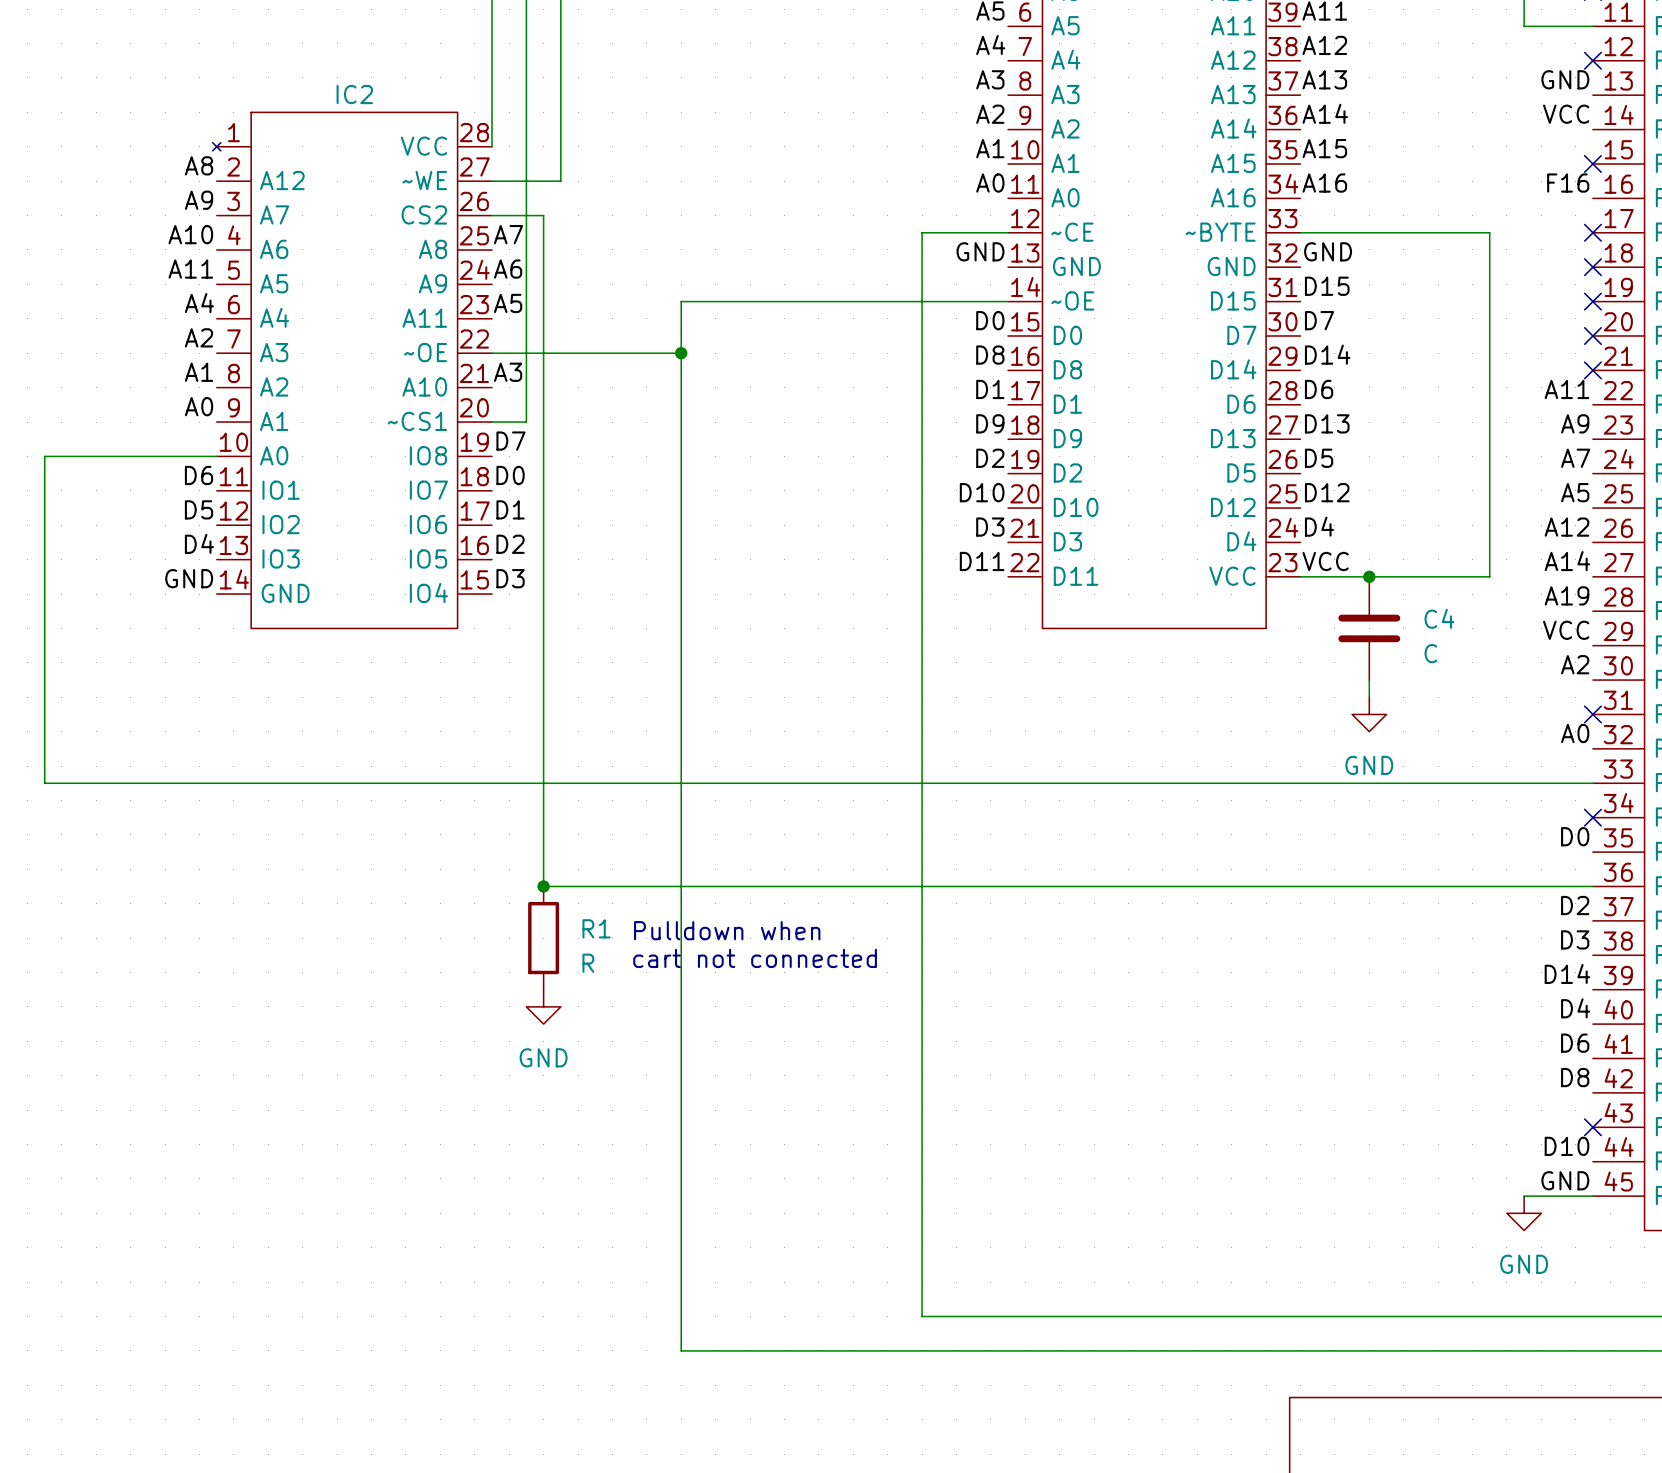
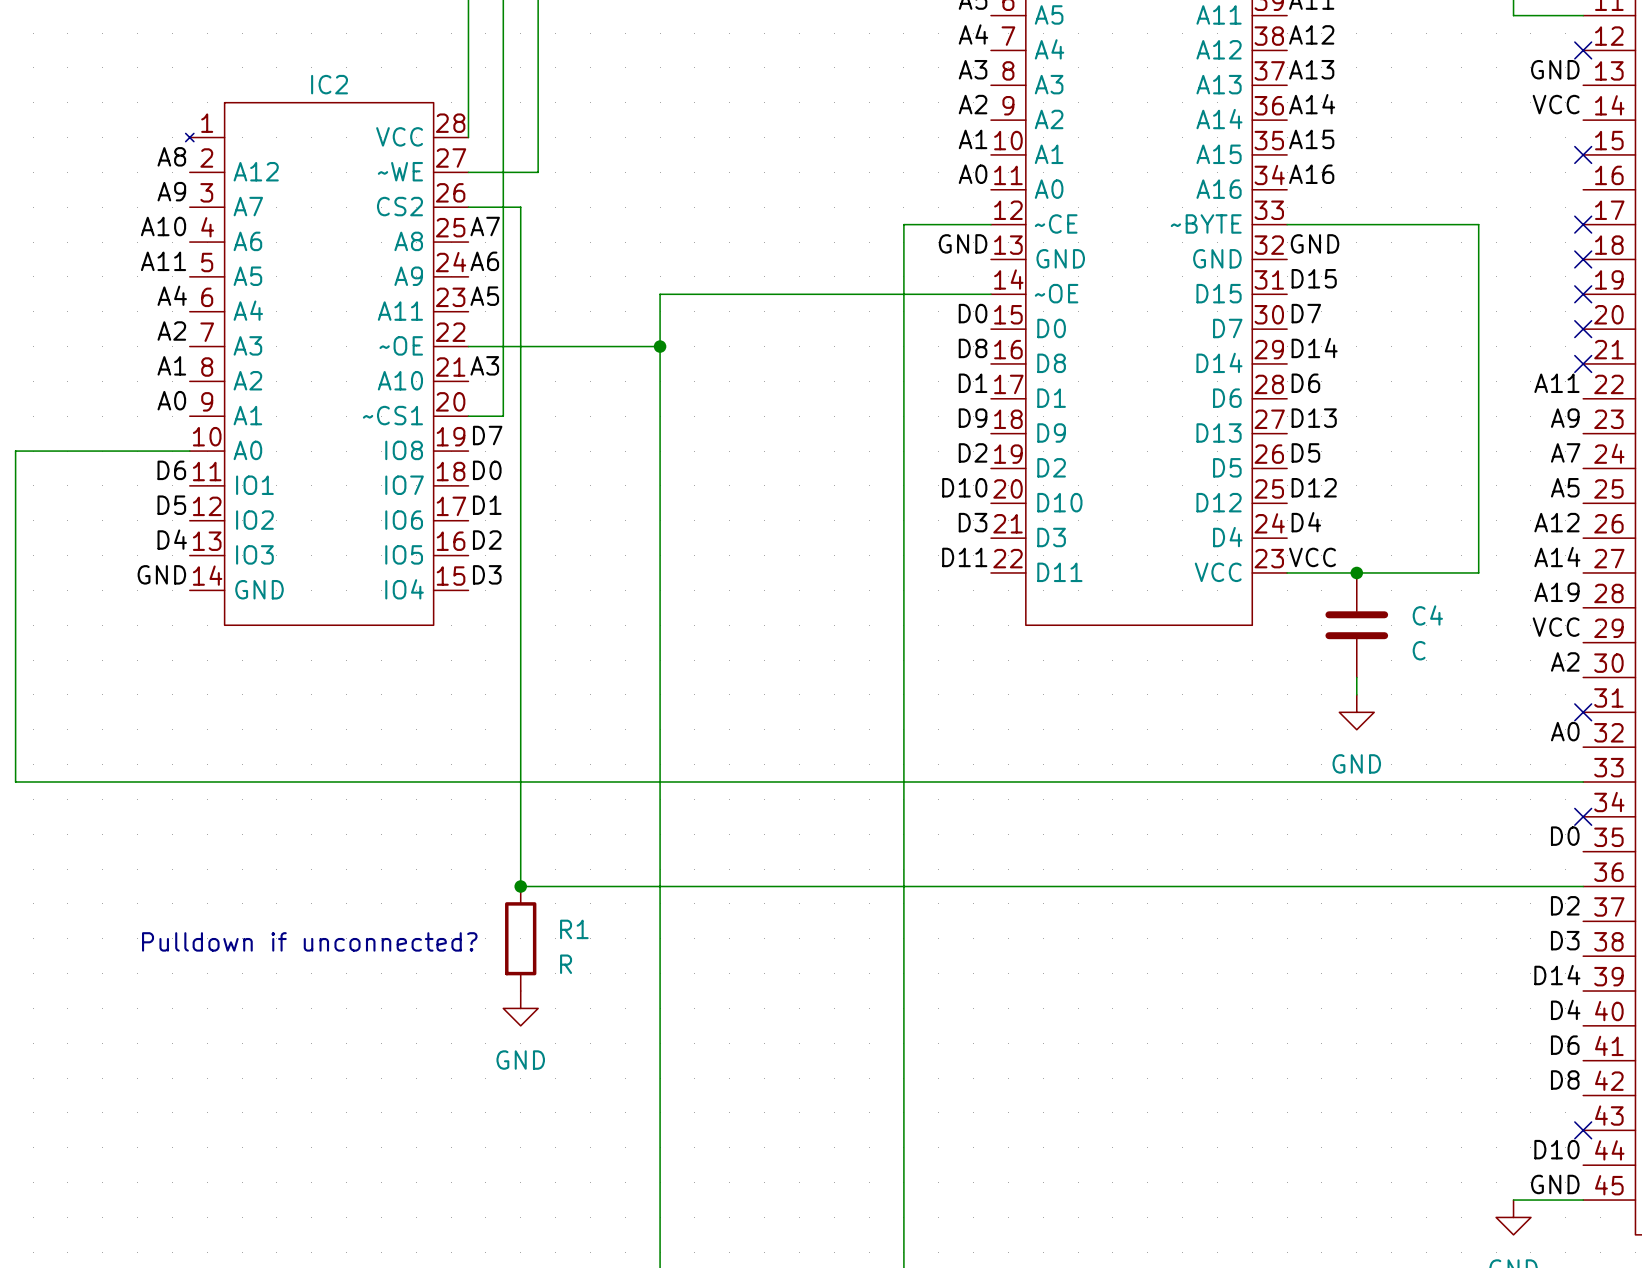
label: F16 (1568, 183) -> none
text: Pulldown when (727, 930) -> none
text: none -> Pulldown if unconnected? (309, 941)
text: cart not connected (755, 958) -> none

